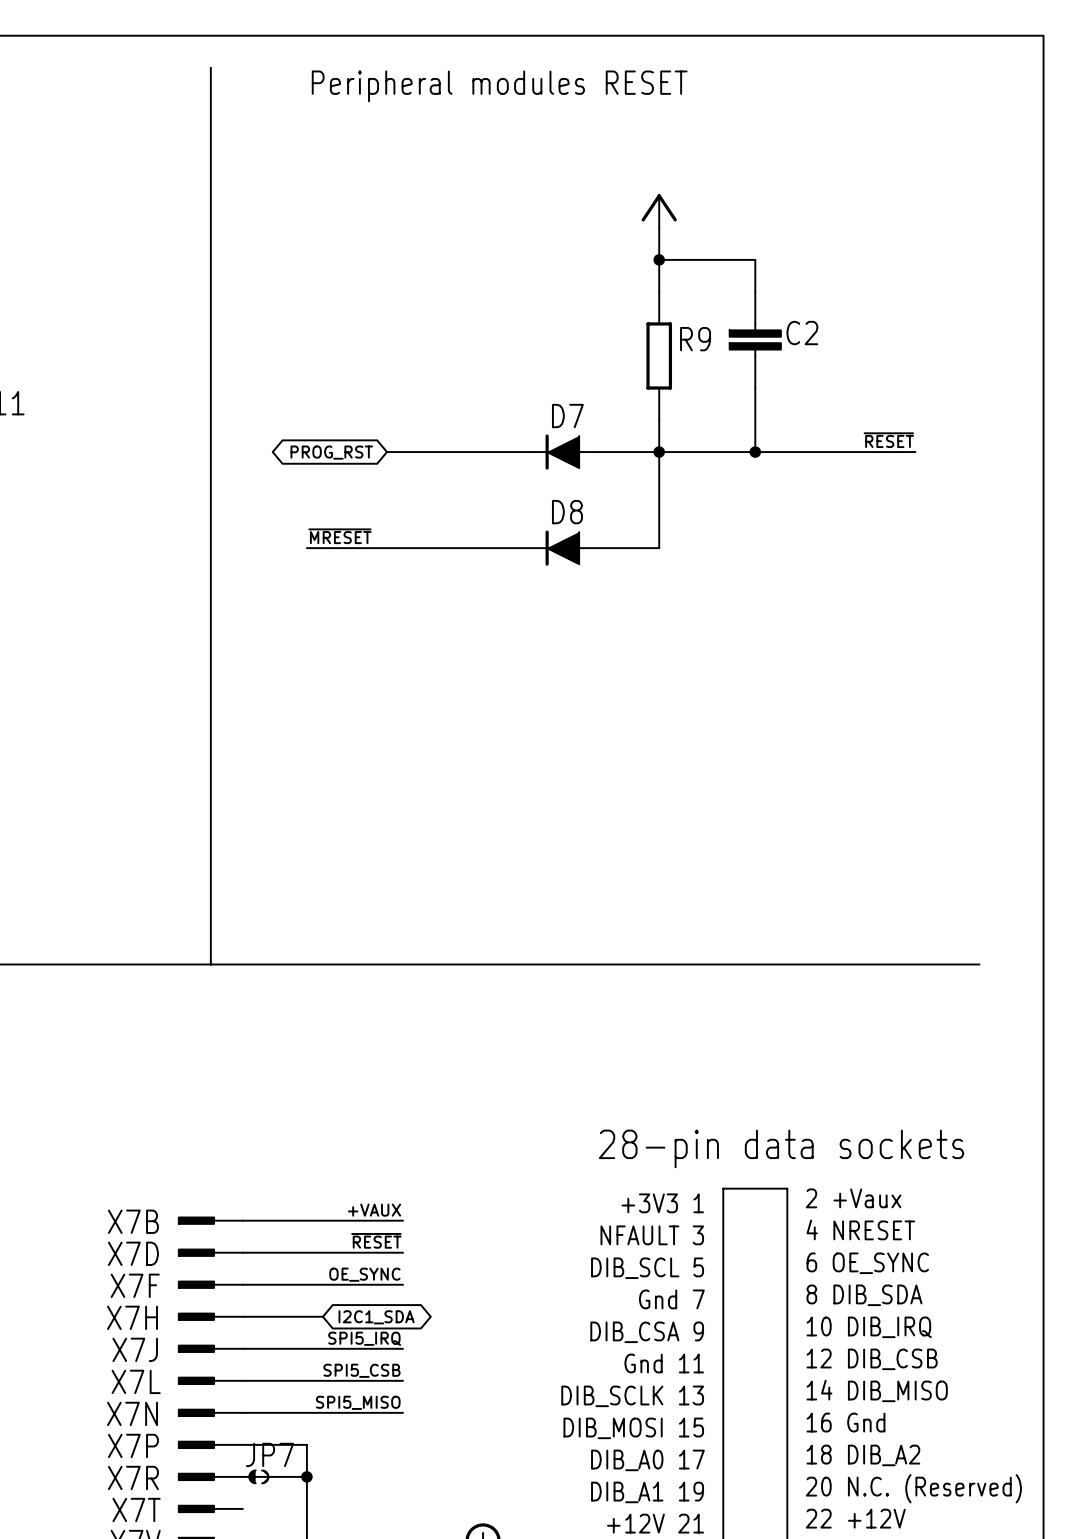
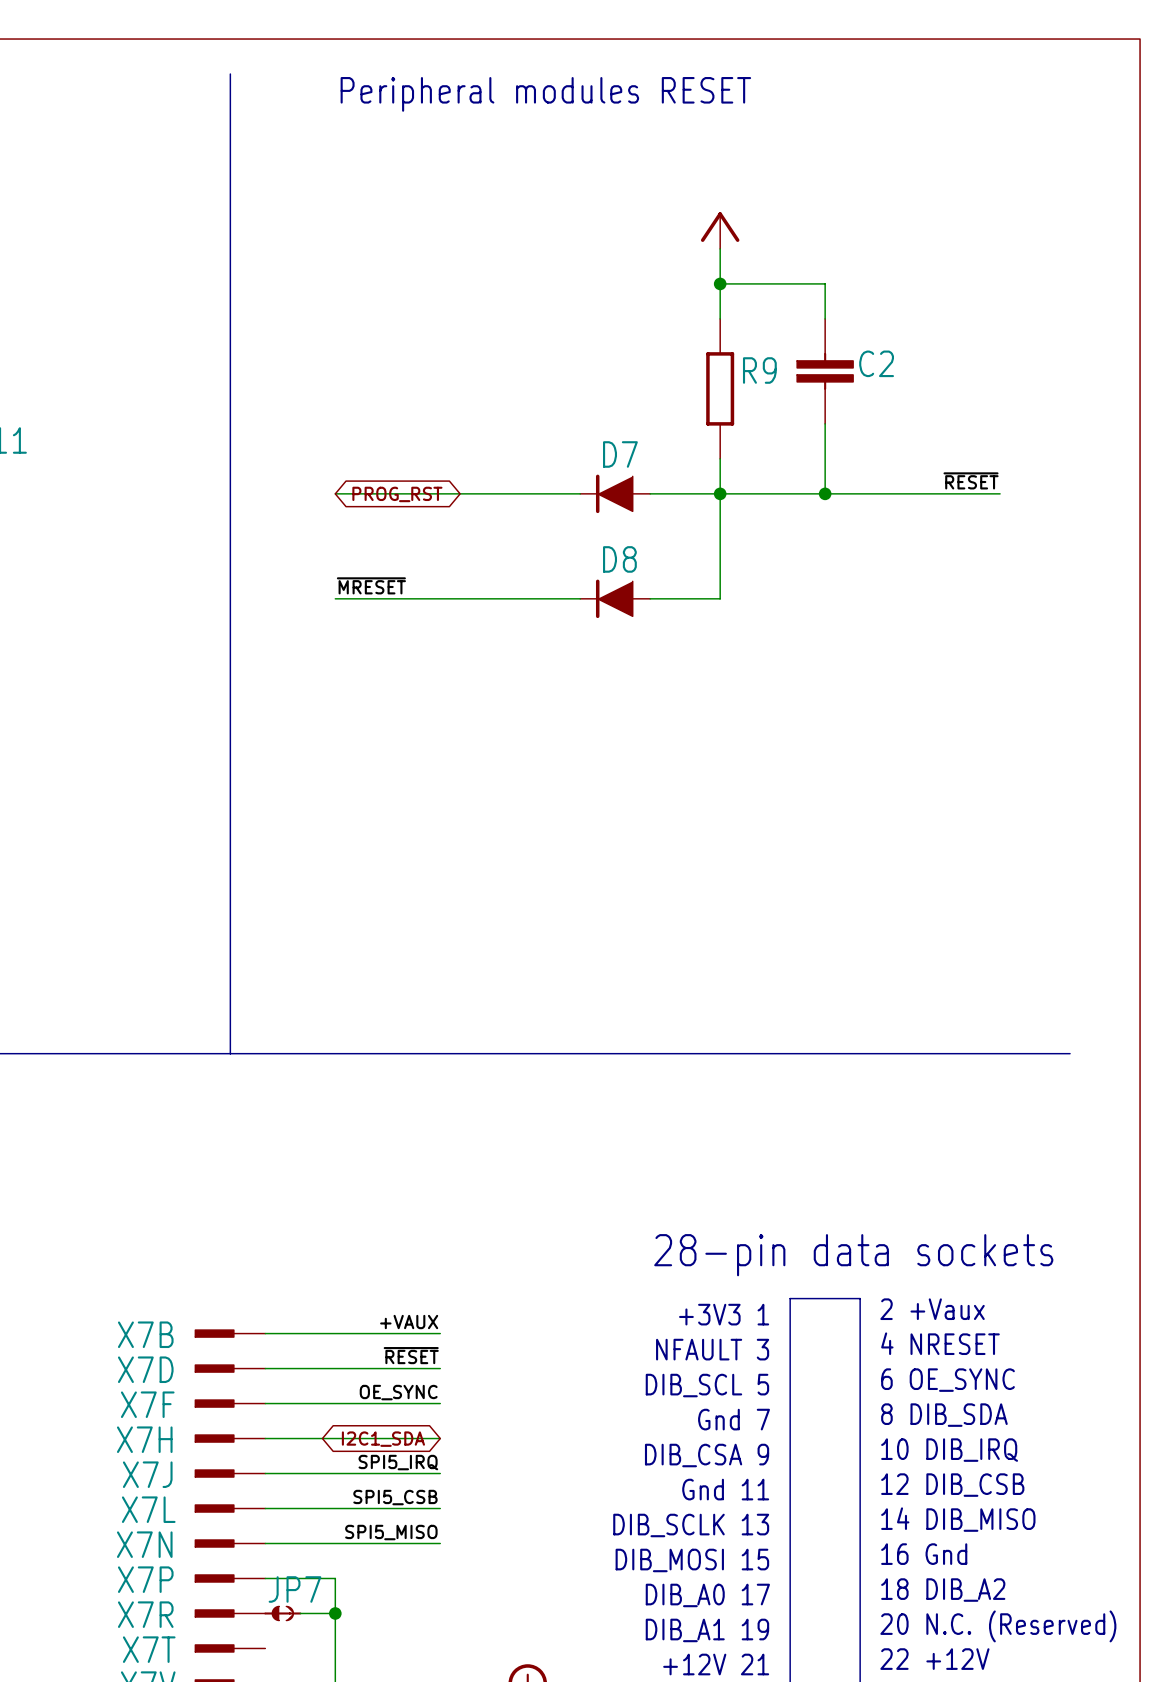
wire: none -> (335, 493) (422, 493)
global label rotation: 0° (331, 452) -> 180° (397, 494)
wire: none -> (352, 1438) (440, 1438)
global label rotation: 0° (376, 1317) -> 180° (383, 1439)

